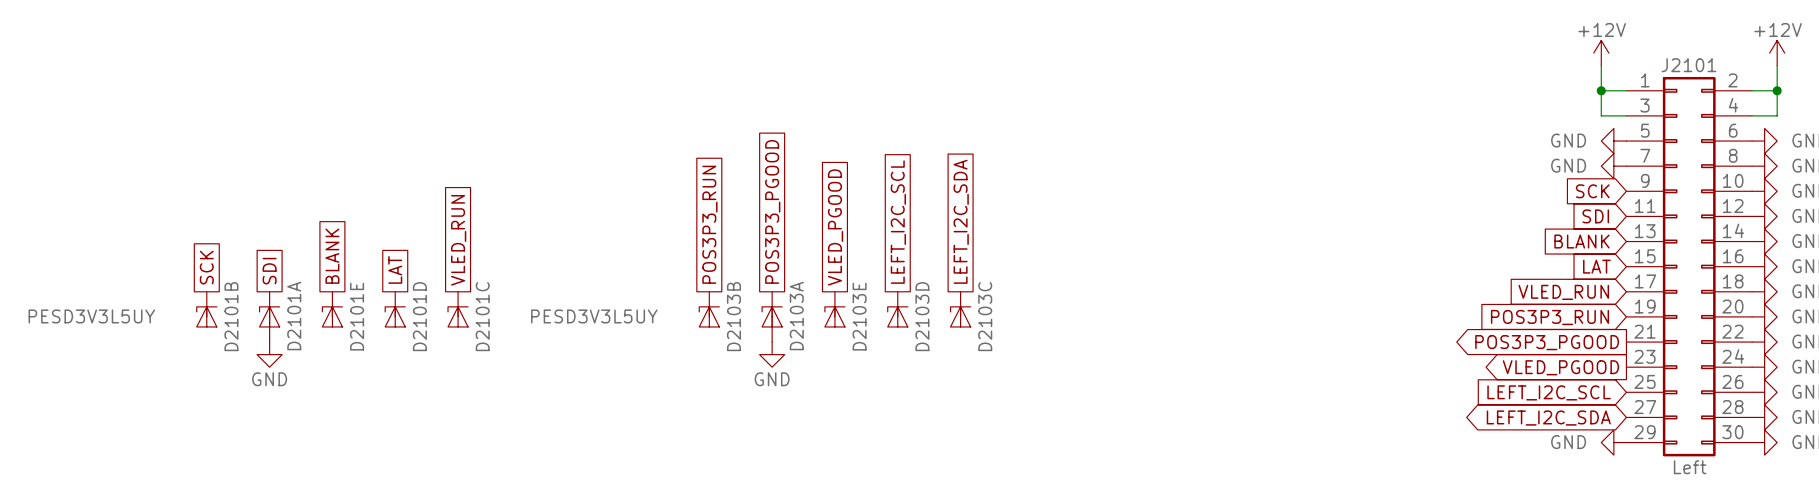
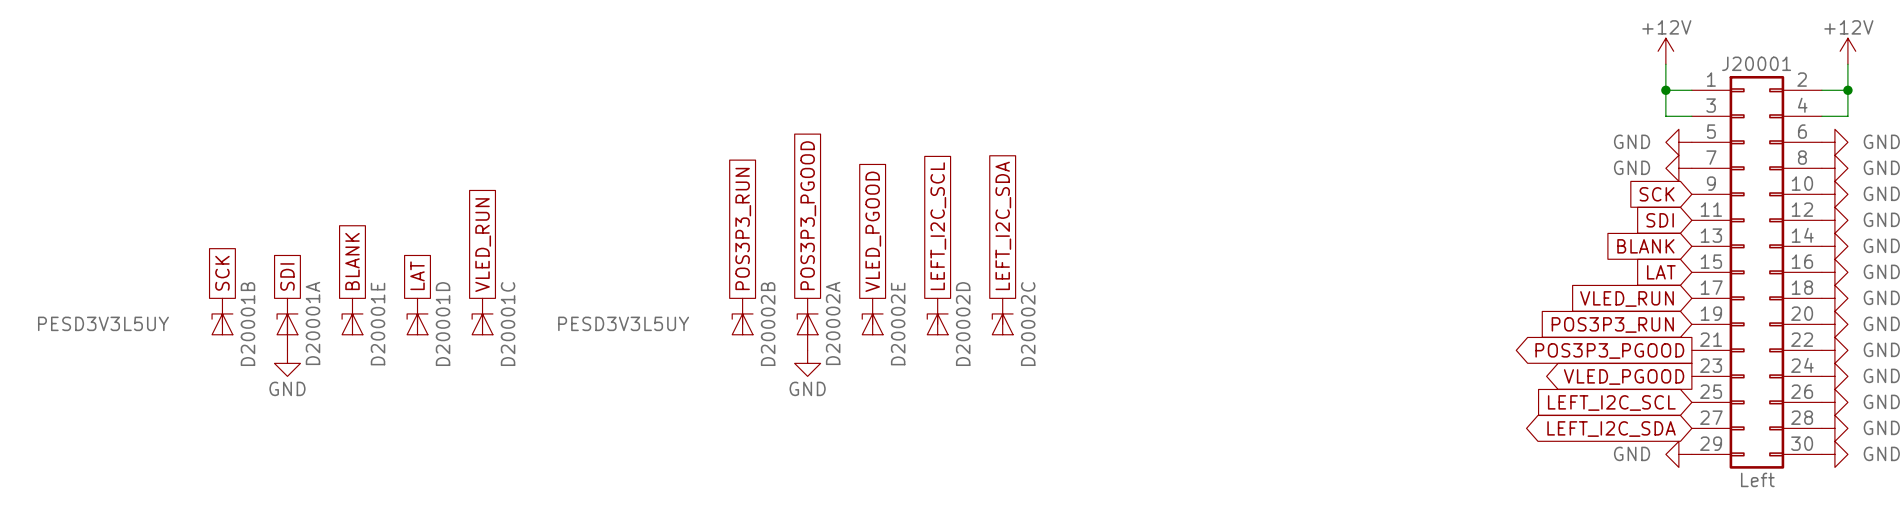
J2101 name: J2101 (1688, 65) -> J20001 (1756, 63)
D2101B name: D2101B (231, 316) -> D20001B (247, 324)
D2101A name: D2101A (294, 316) -> D20001A (312, 323)
D2101E name: D2101E (357, 316) -> D20001E (378, 324)
D2101D name: D2101D (419, 316) -> D20001D (443, 324)
D2101C name: D2101C (482, 316) -> D20001C (508, 324)
D2103B name: D2103B (733, 316) -> D20002B (768, 324)
D2103A name: D2103A (796, 316) -> D20002A (833, 323)
D2103E name: D2103E (859, 316) -> D20002E (898, 324)
D2103D name: D2103D (922, 316) -> D20002D (963, 324)
D2103C name: D2103C (985, 316) -> D20002C (1028, 324)

